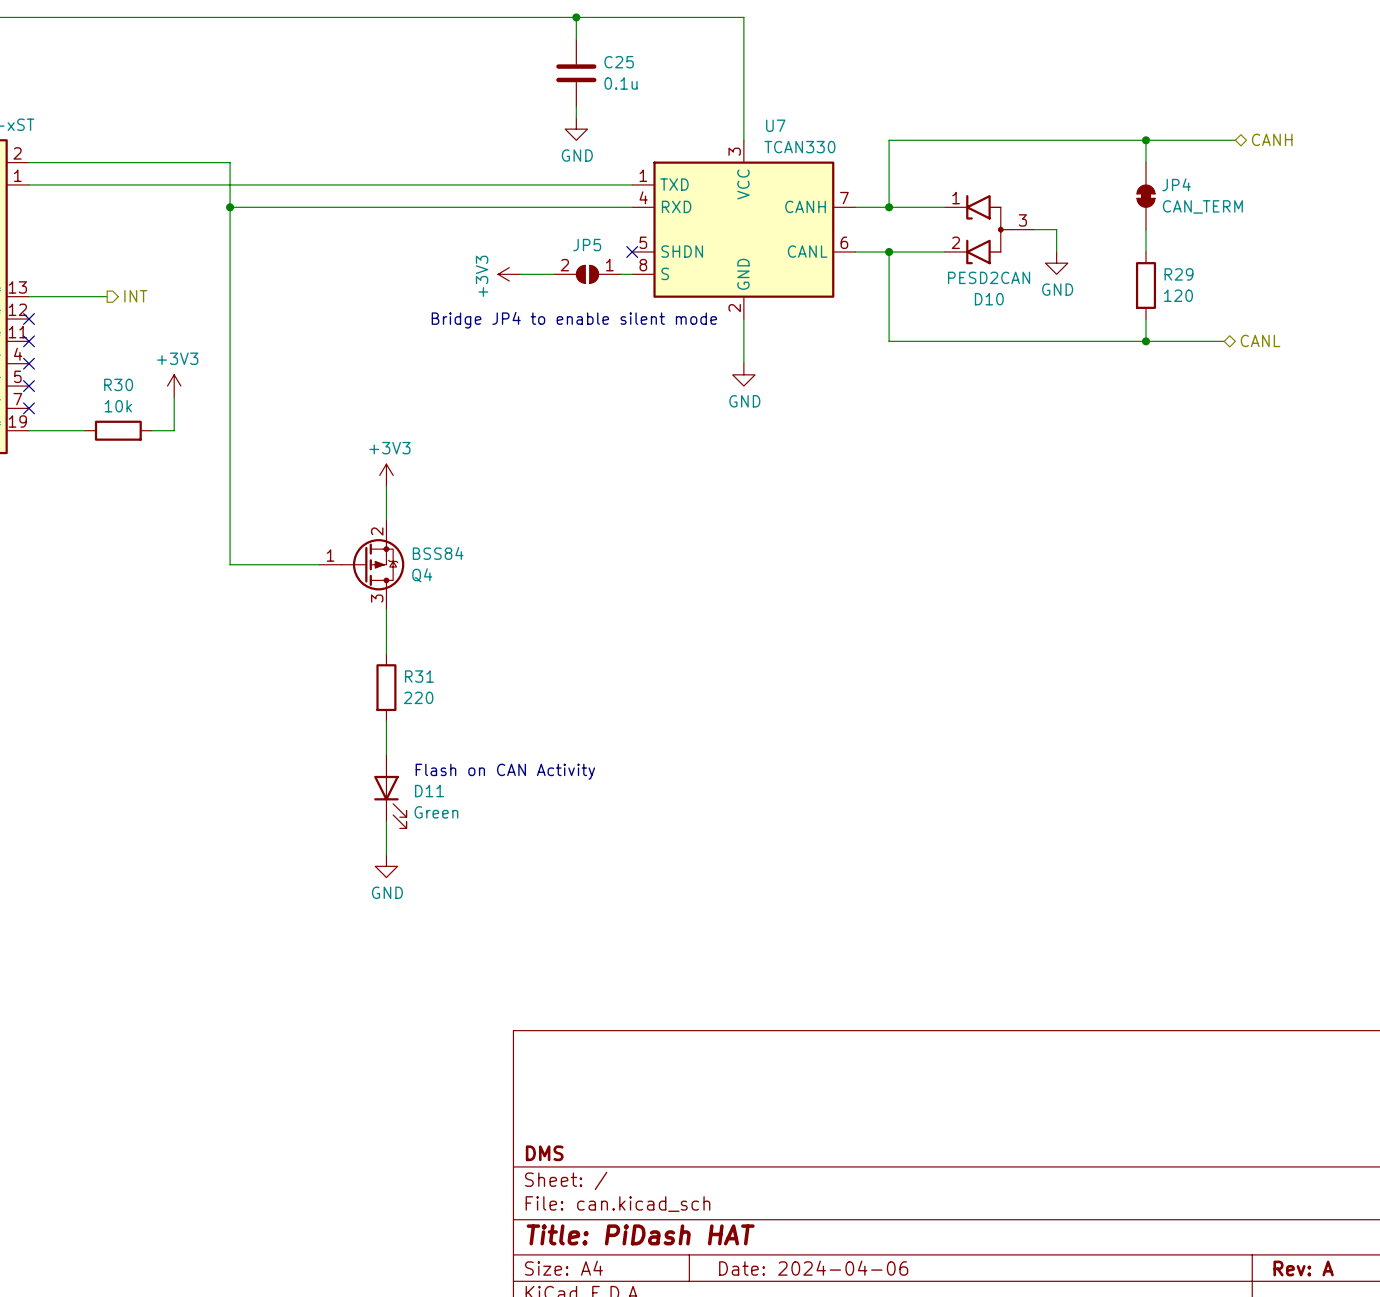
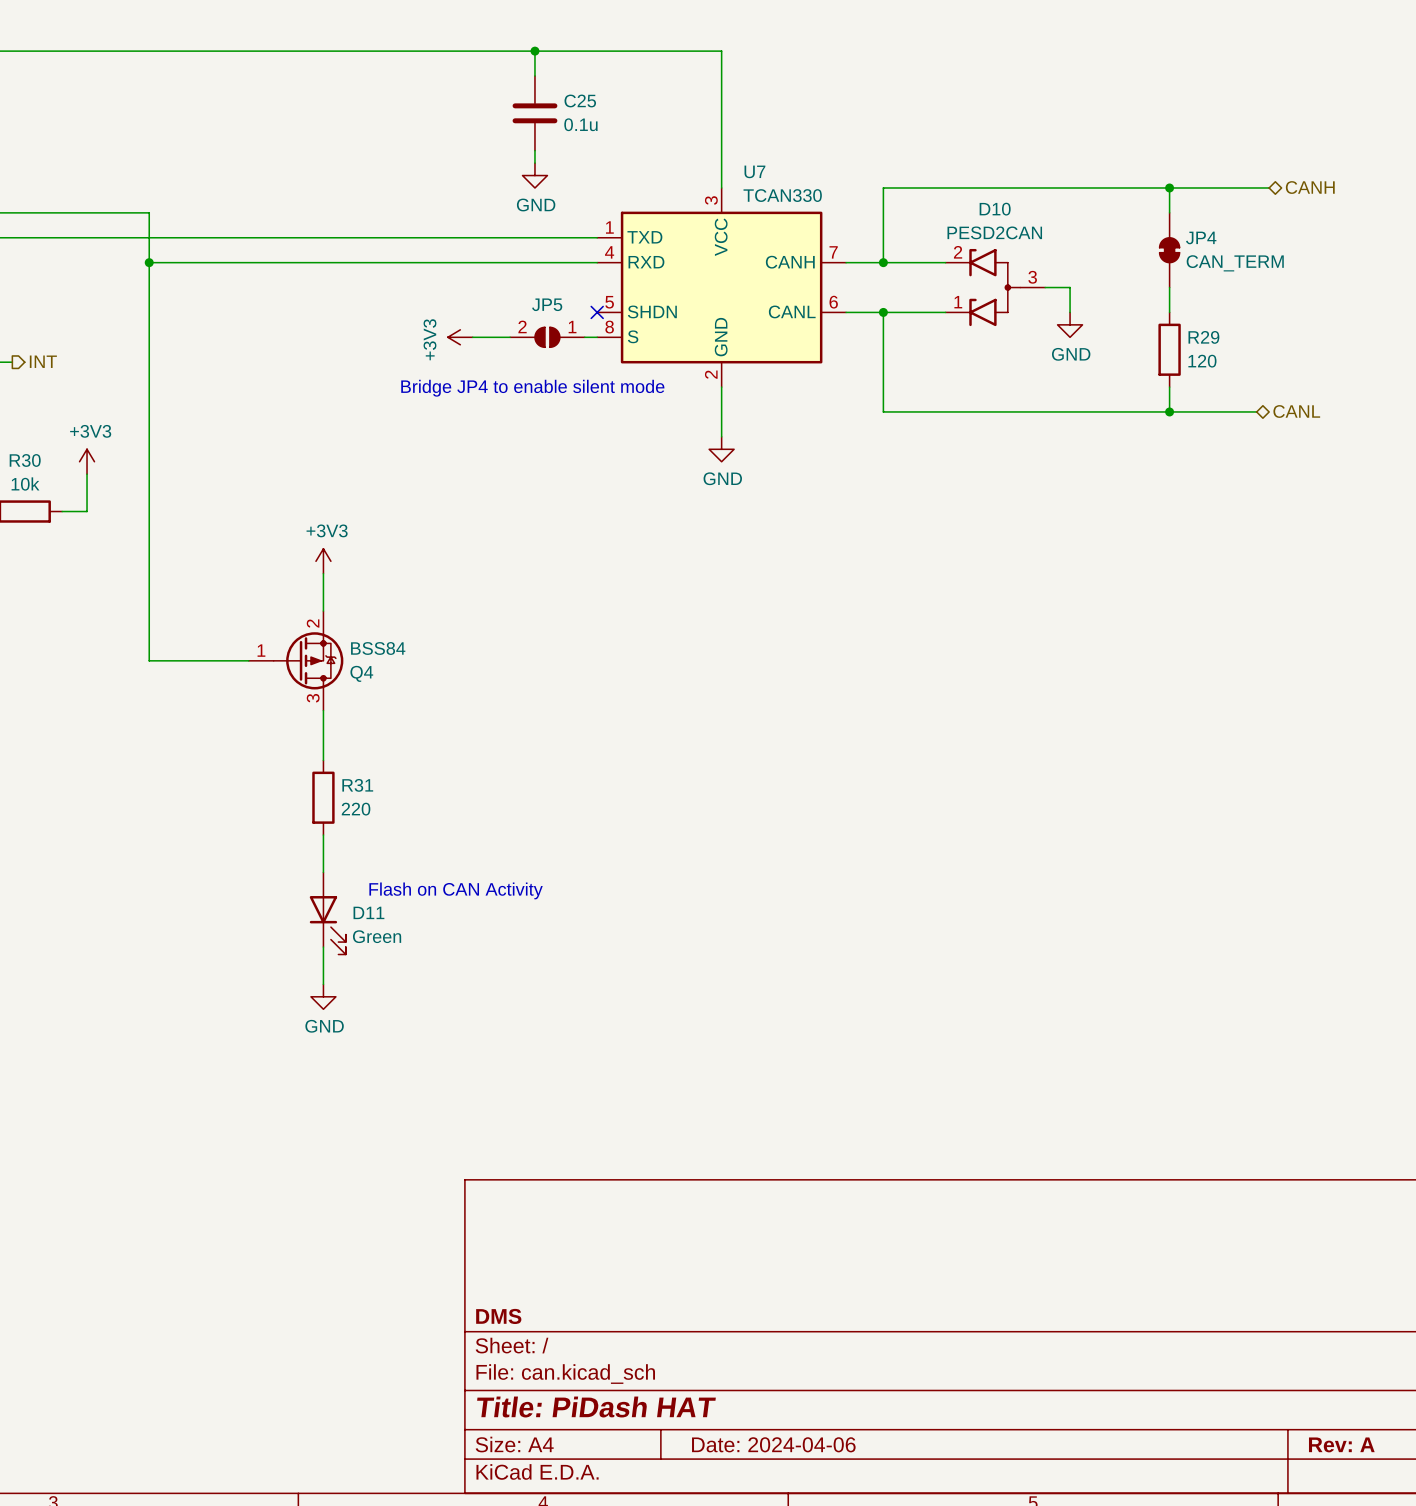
D10 flip: as is (989, 229) -> up-down (994, 287)

